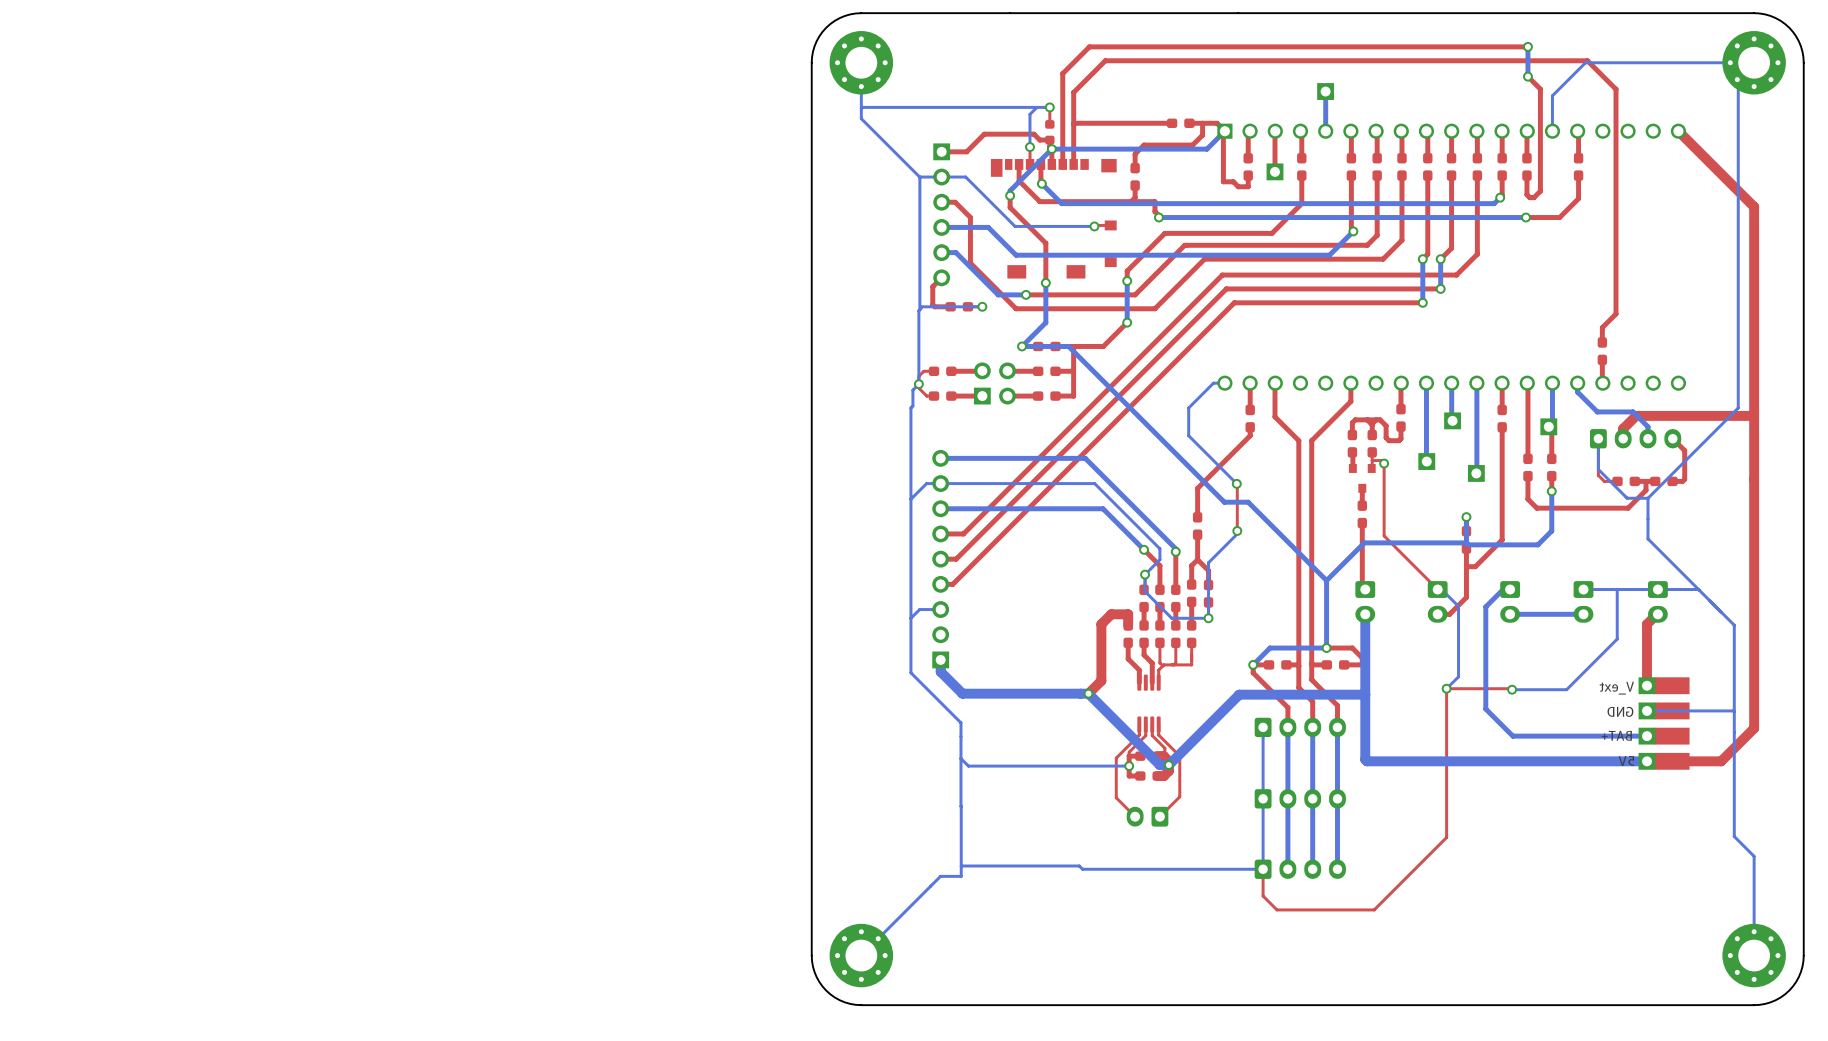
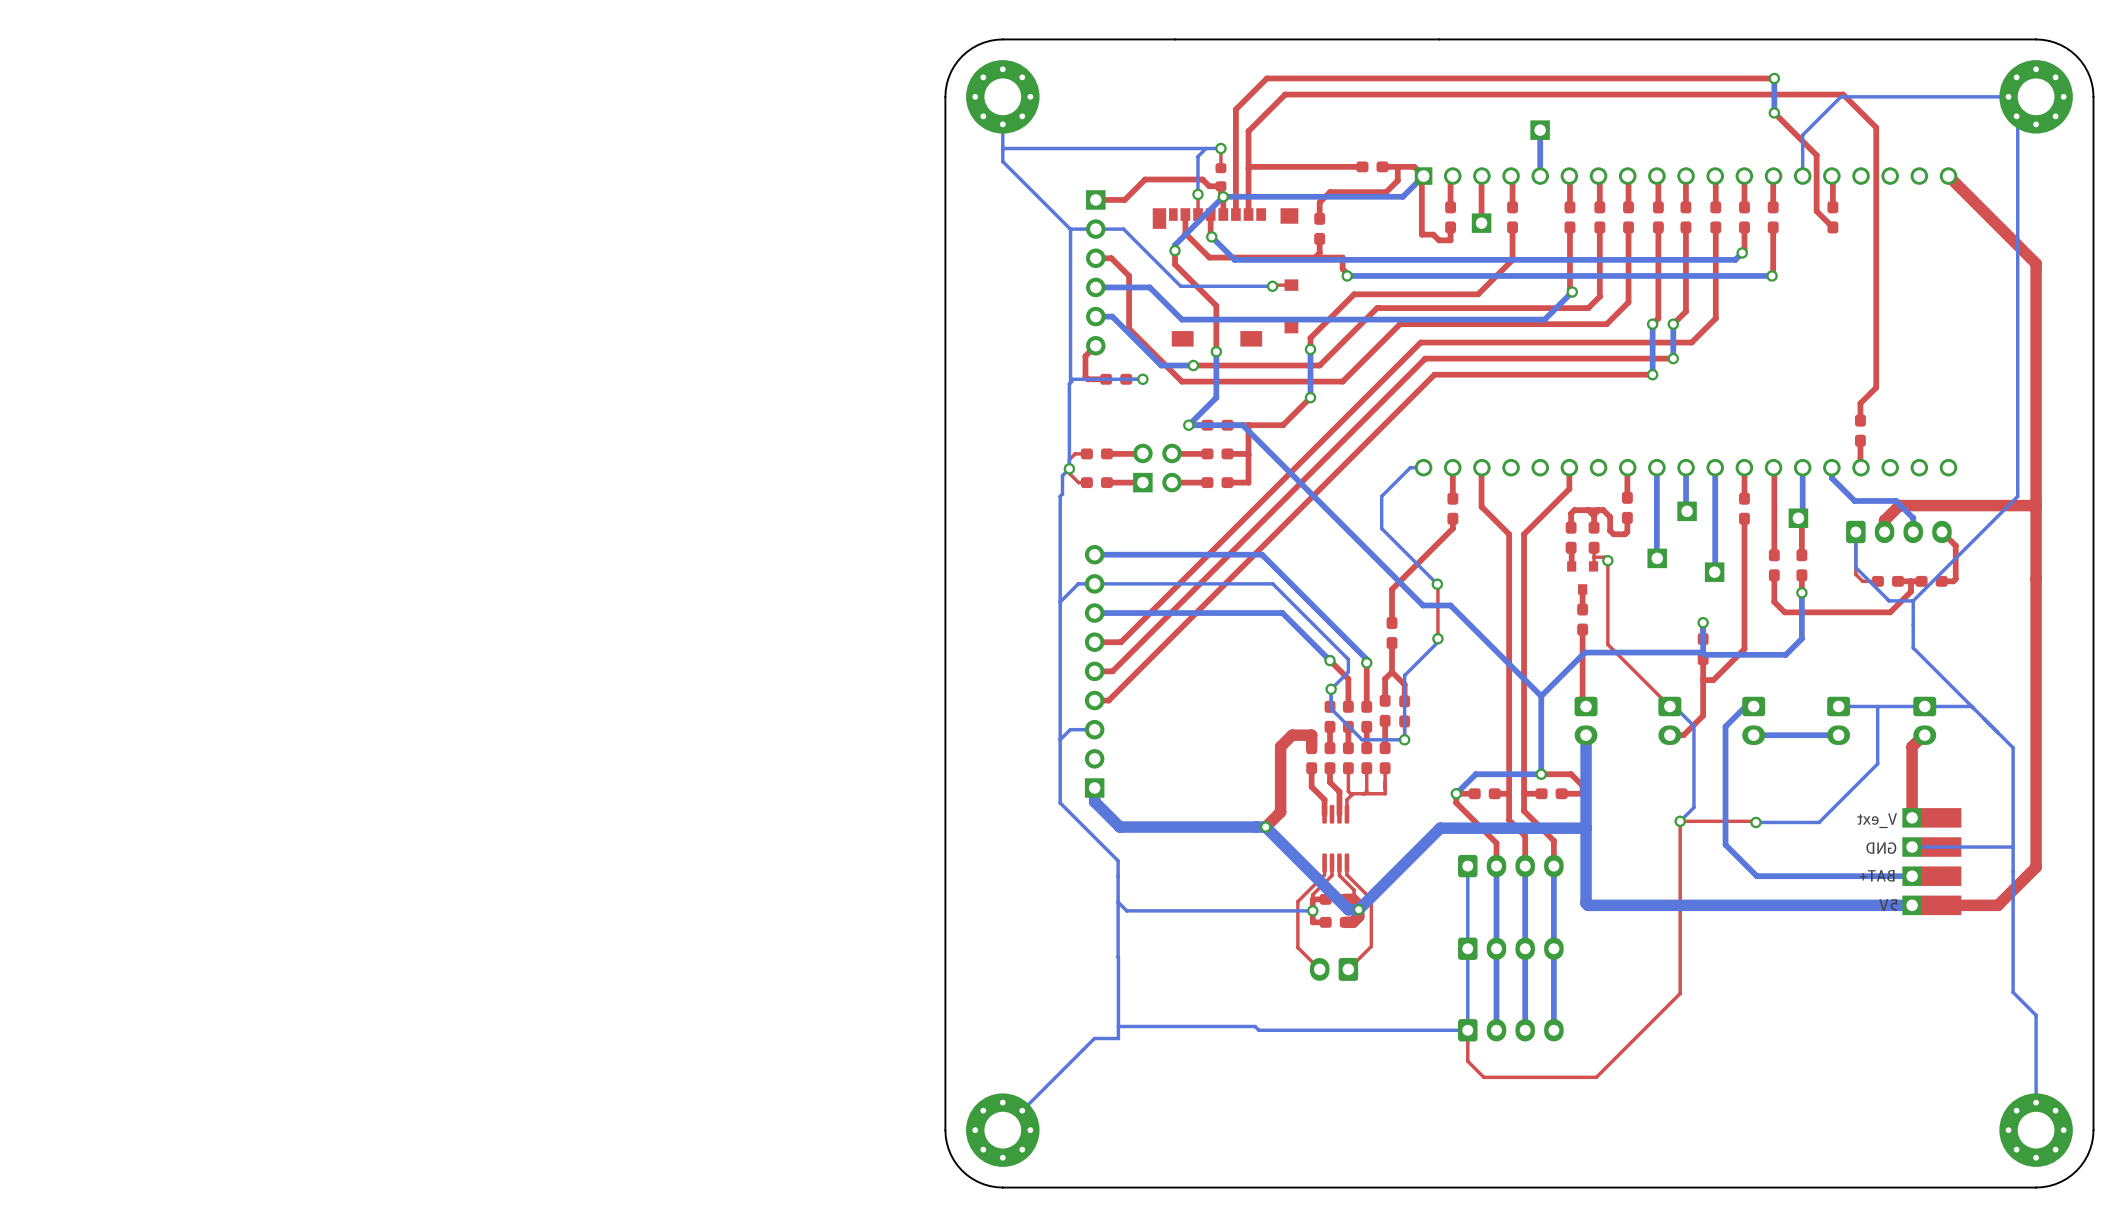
top track: (1540, 89) (1540, 191) (1533, 197) (1529, 197) (1526, 194) -> (1788, 127) (1816, 155) (1816, 211) (1832, 227)
top track: (1578, 175) (1578, 198) (1559, 217) (1525, 217) -> none
top track: none -> (1773, 249) (1773, 274)

